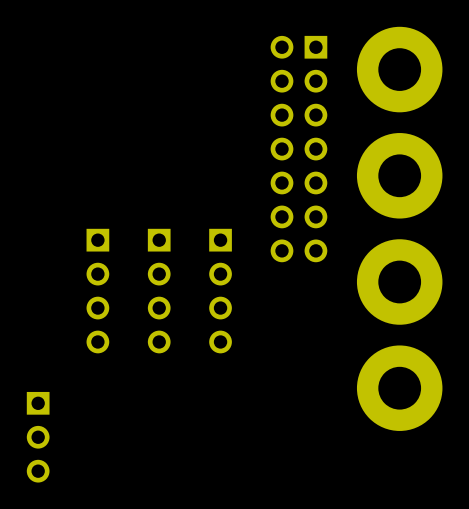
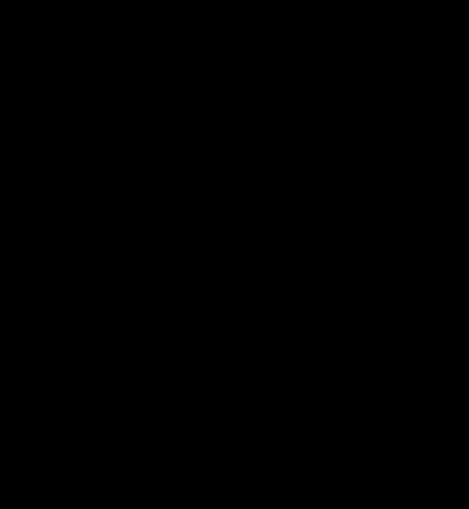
part: (399, 69) -> none
part: (298, 149) -> none
part: (399, 175) -> none
part: (399, 282) -> none
part: (97, 291) -> none
part: (159, 291) -> none
part: (220, 291) -> none
part: (399, 388) -> none
part: (38, 437) -> none

